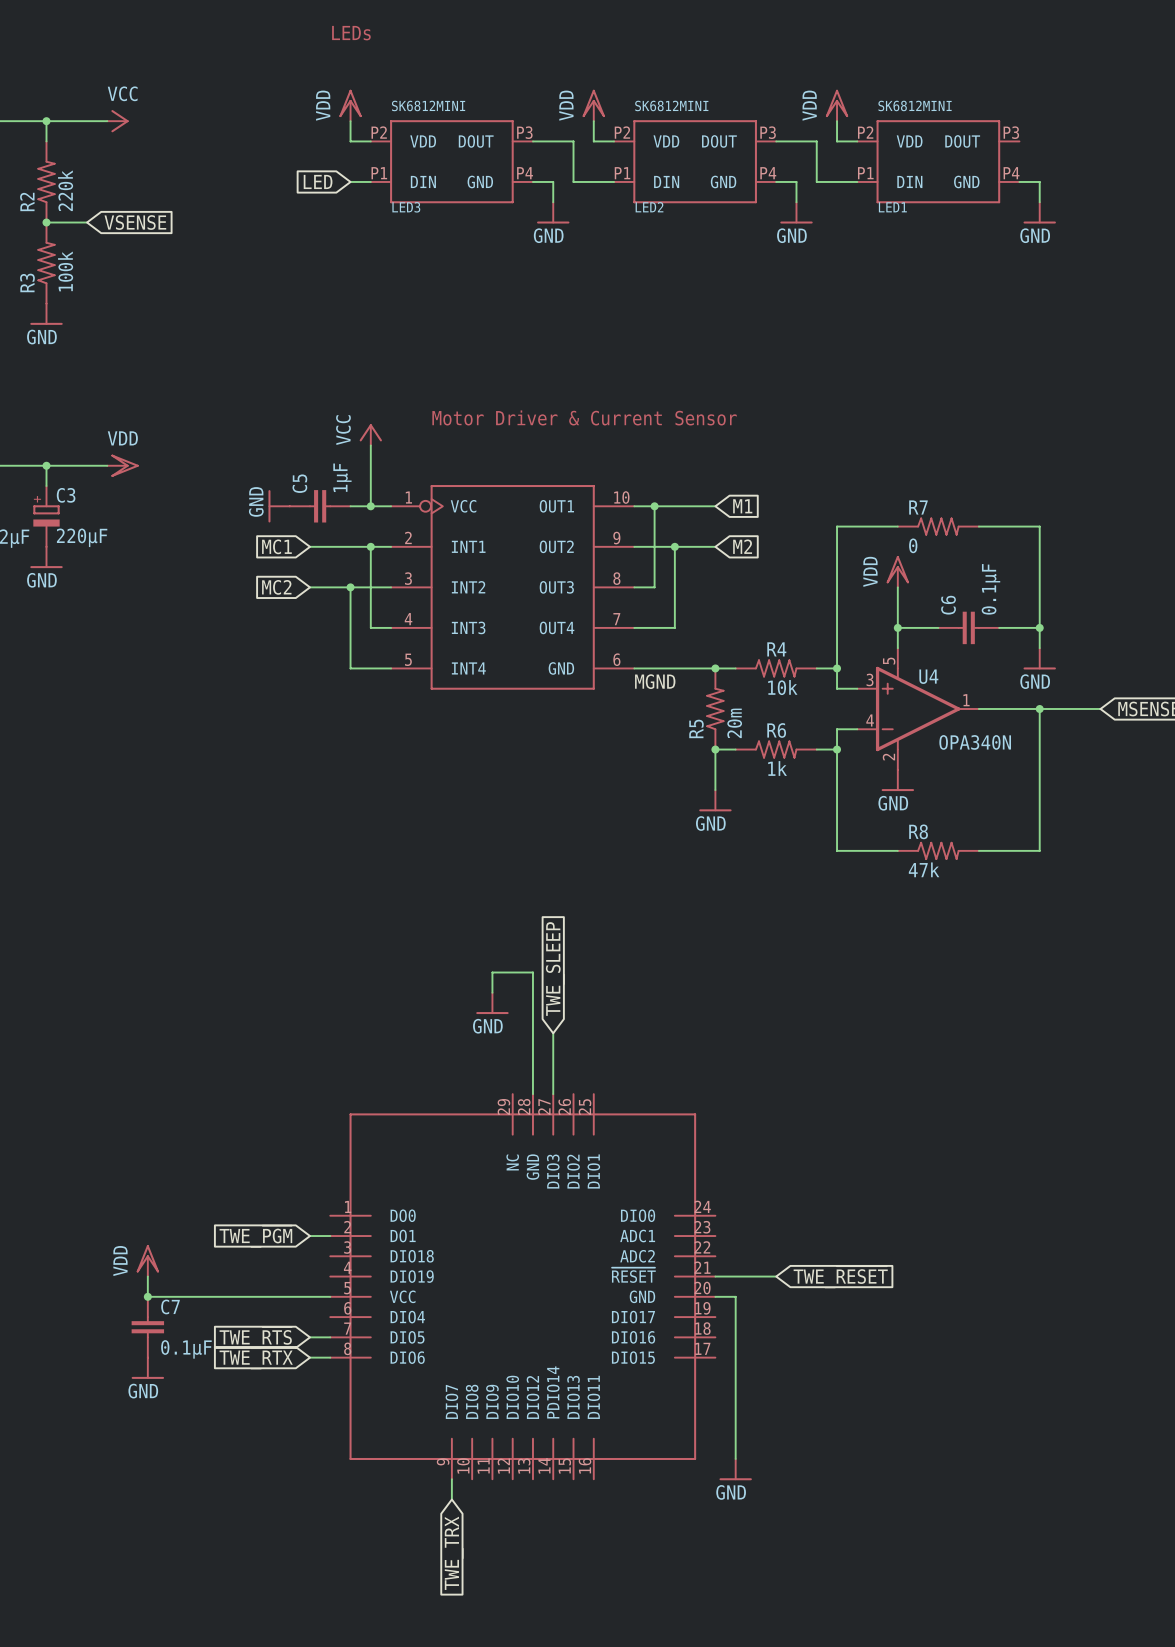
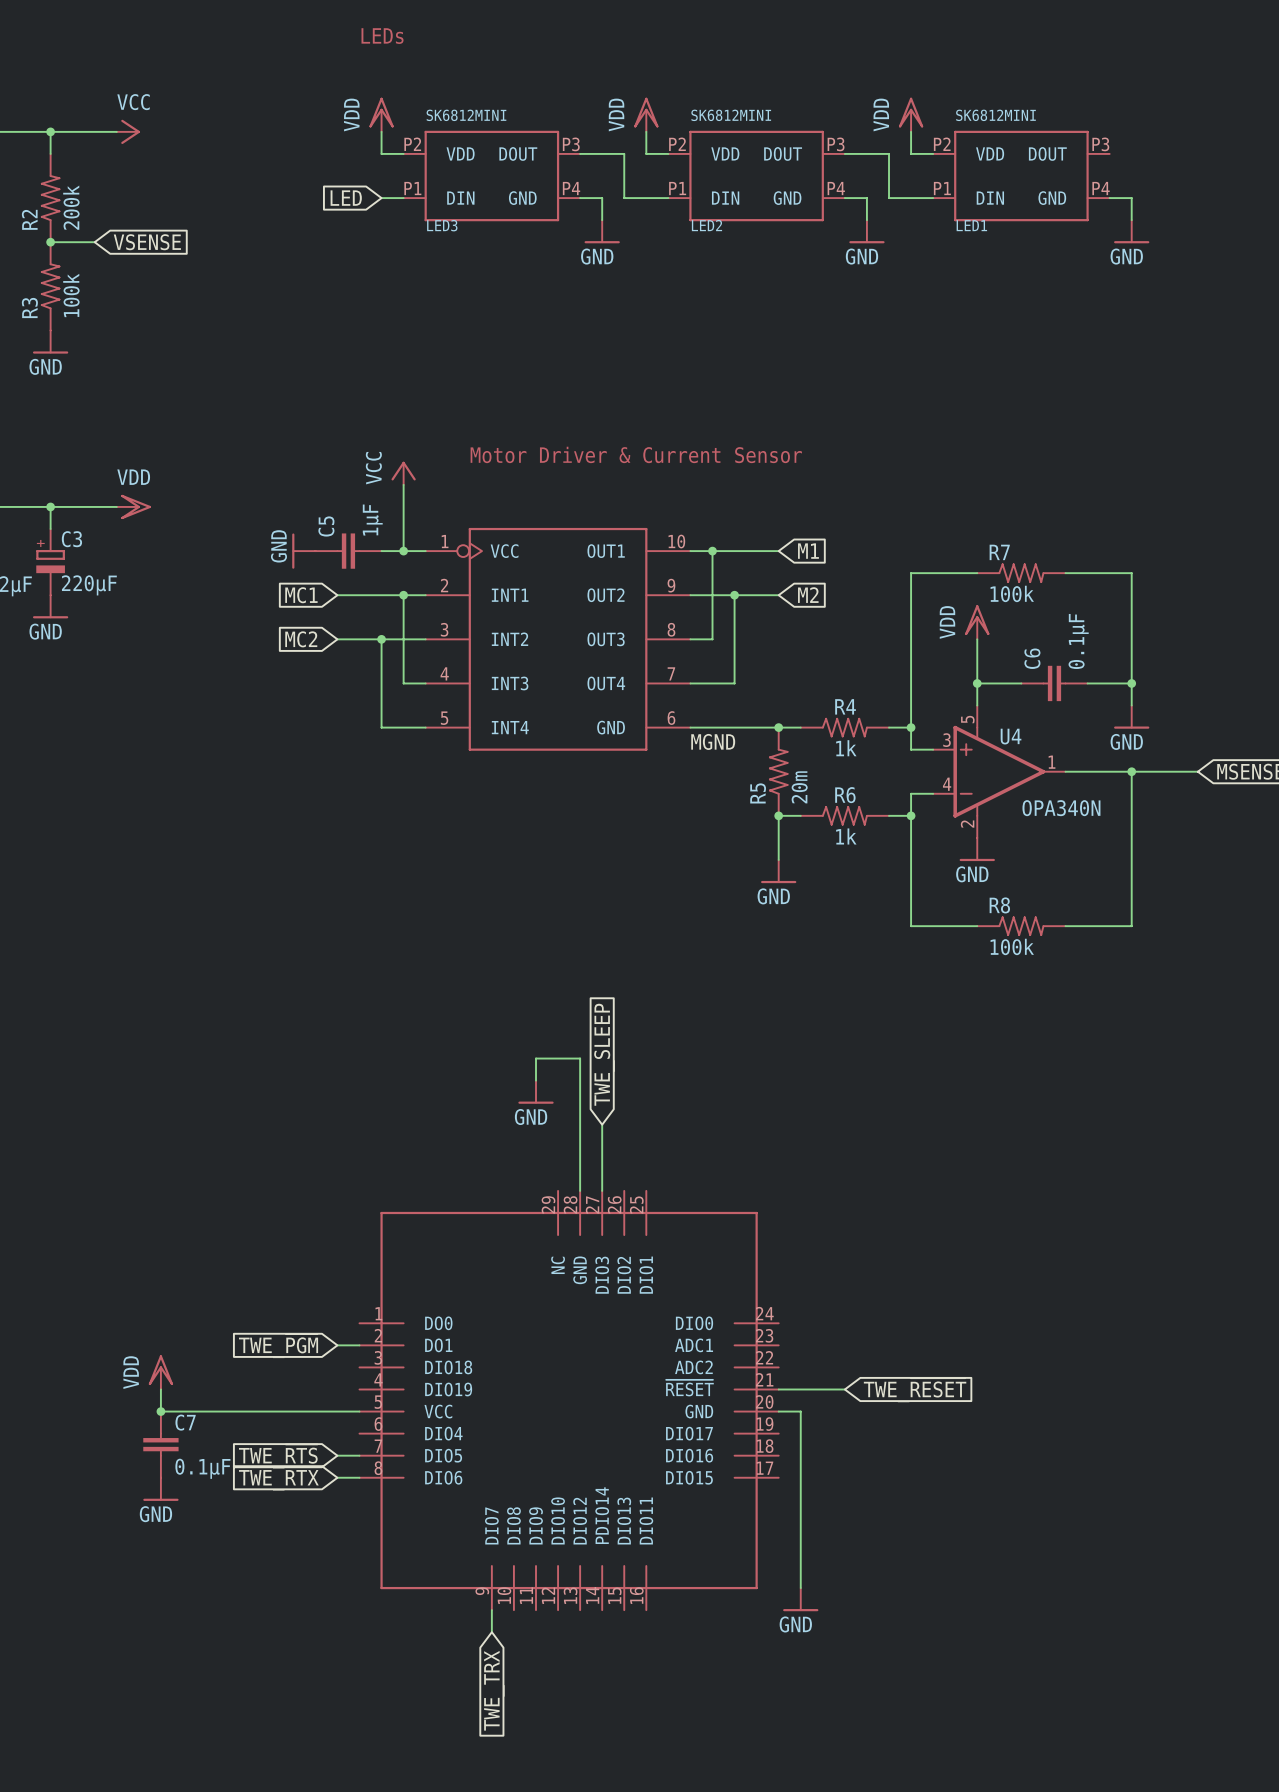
R2 value: 220k (65, 190) -> 200k (71, 207)
R7 value: 0 (913, 545) -> 100k (1012, 593)
R4 value: 10k (782, 687) -> 1k (846, 748)
R8 value: 47k (924, 869) -> 100k (1012, 946)

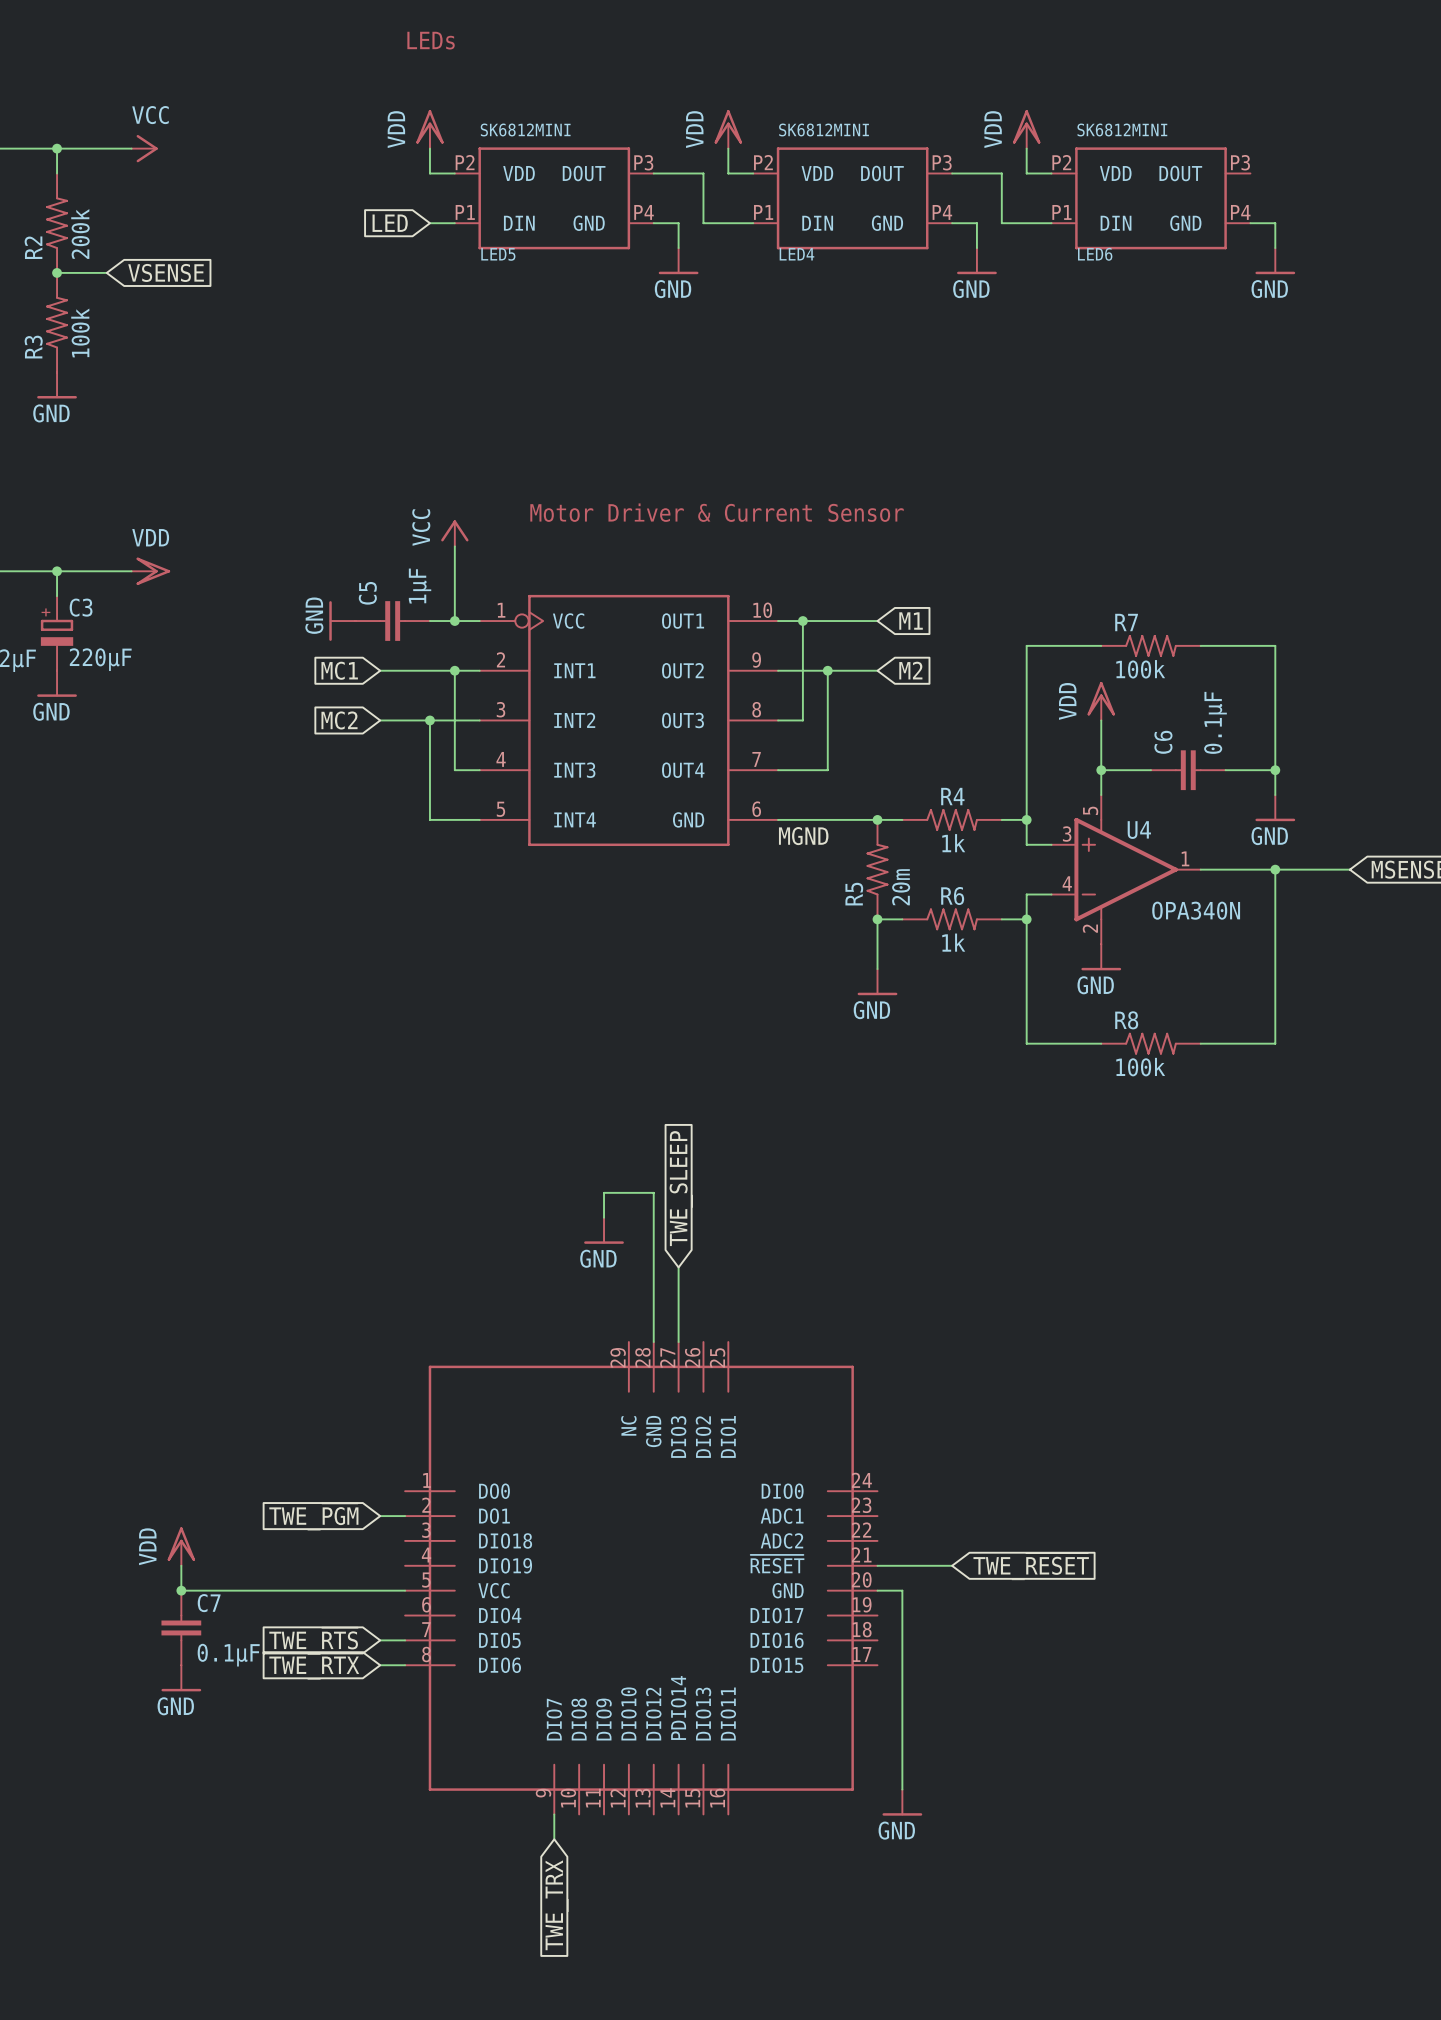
LED3 name: LED3 (442, 225) -> LED5 (498, 254)
LED2 name: LED2 (706, 225) -> LED4 (796, 254)
LED1 name: LED1 (971, 225) -> LED6 (1095, 254)

